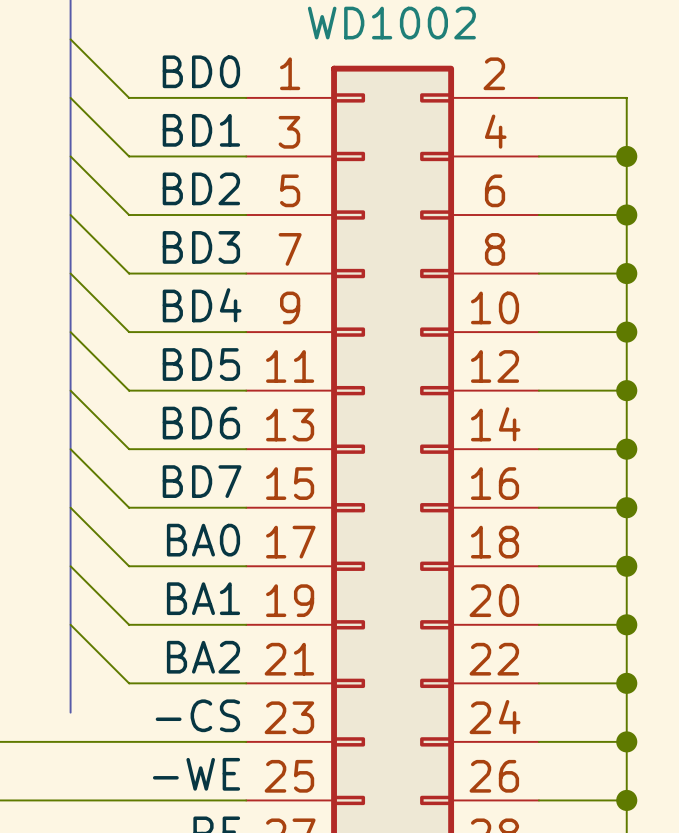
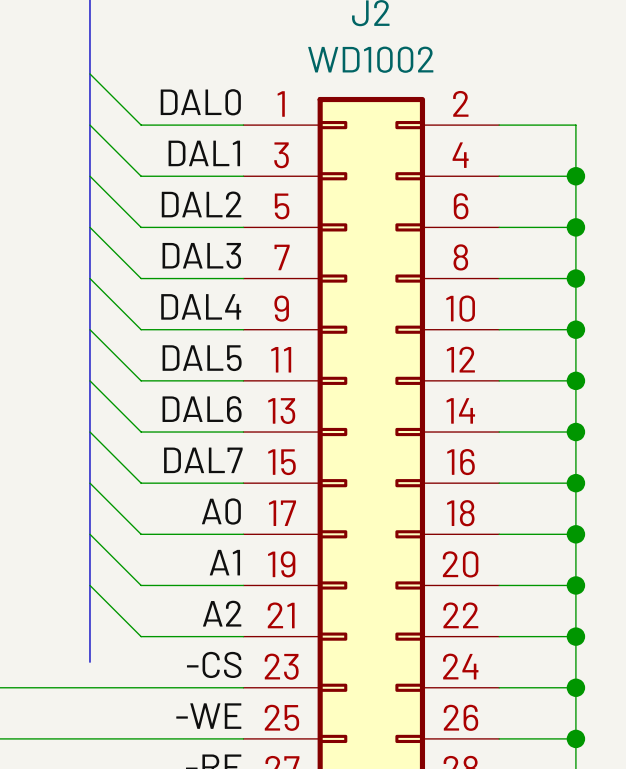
label: BD0 (201, 71) -> DAL0 (200, 102)
label: BD1 (201, 130) -> DAL1 (204, 153)
label: BD2 (201, 188) -> DAL2 (201, 204)
label: BD3 (201, 247) -> DAL3 (201, 255)
label: BD4 (202, 305) -> DAL4 (201, 306)
label: BD5 (201, 364) -> DAL5 (202, 358)
label: BD6 (201, 423) -> DAL6 (202, 409)
label: BD7 (202, 481) -> DAL7 (203, 460)
label: BA0 (203, 540) -> A0 (221, 511)
label: BA1 (203, 598) -> A1 (224, 562)
label: BA2 (203, 657) -> A2 (222, 613)

